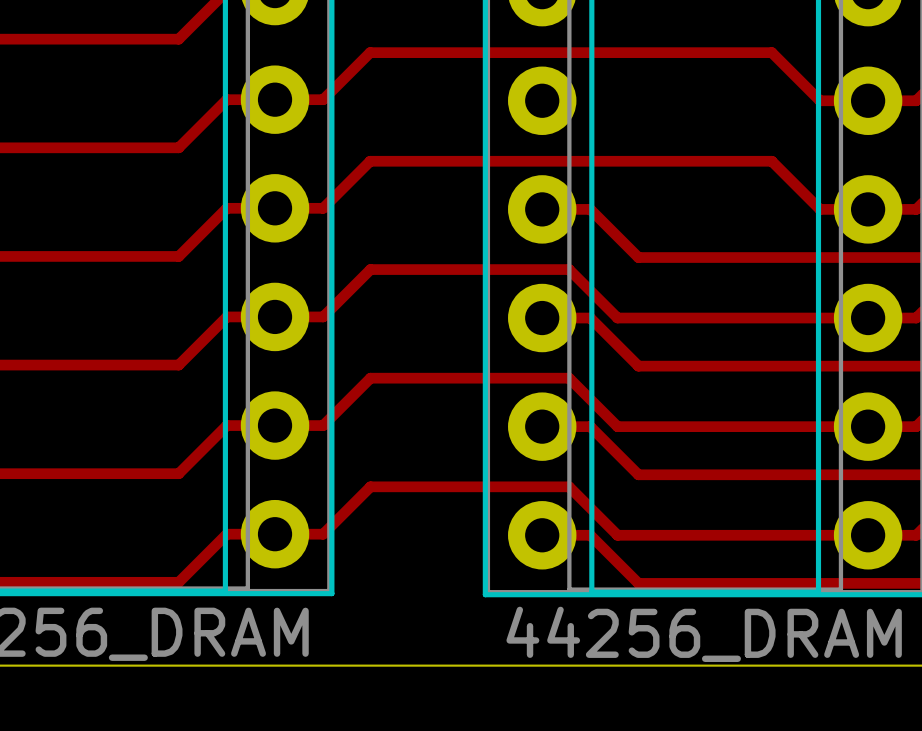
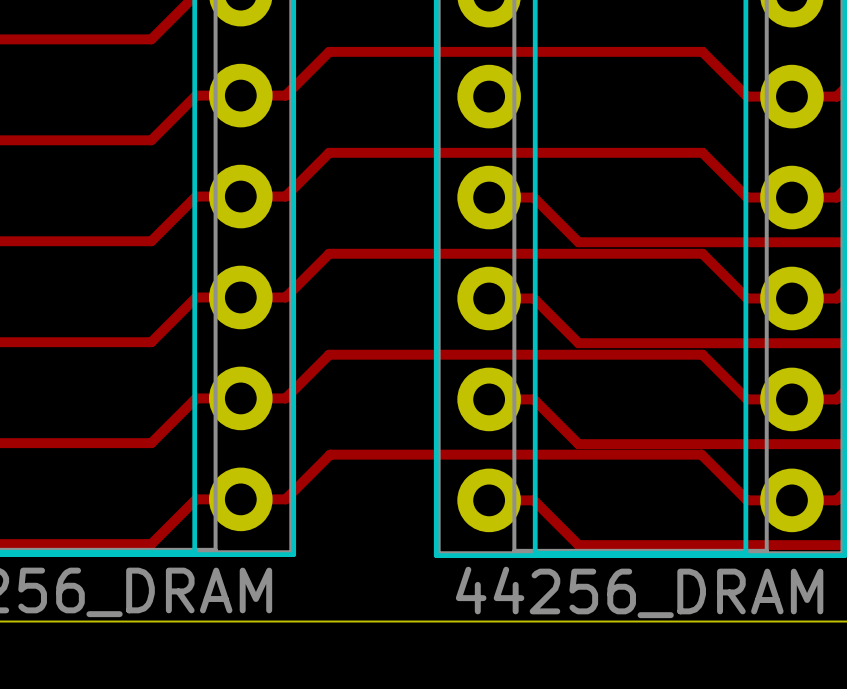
track: (370, 269) (569, 269) (617, 318) (819, 318) -> (329, 253) (702, 253) (747, 298)
track: (370, 378) (569, 378) (617, 426) (819, 426) -> (329, 354) (702, 354) (747, 399)
track: (370, 486) (569, 486) (617, 535) (819, 535) -> (329, 455) (701, 454) (747, 500)

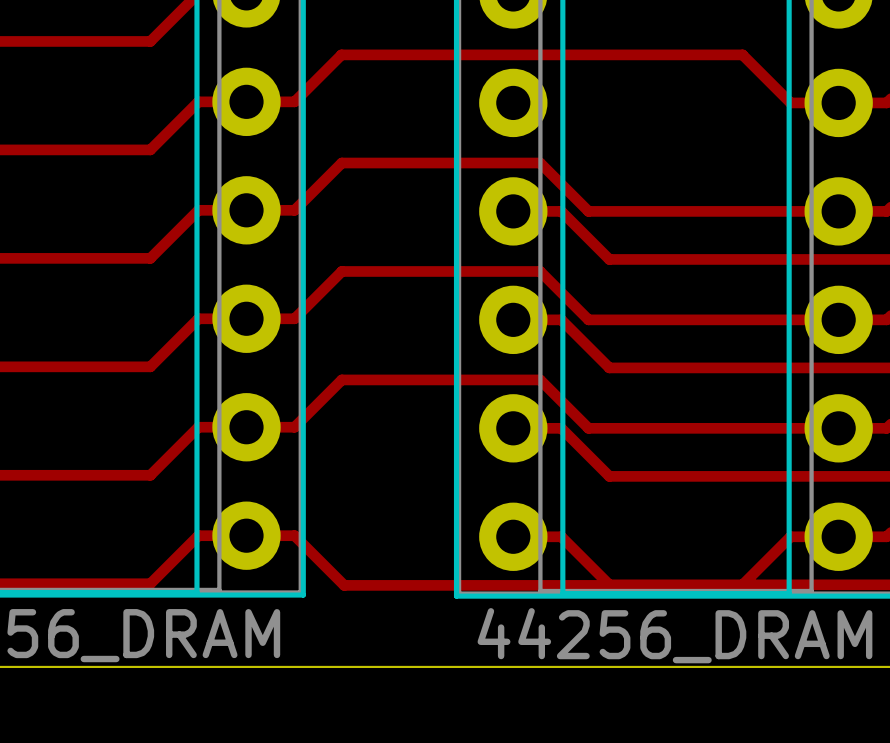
track: (329, 152) (702, 152) (747, 197) -> (341, 163) (540, 163) (588, 211) (790, 211)
track: (329, 253) (702, 253) (747, 298) -> (341, 271) (540, 271) (588, 319) (790, 319)
track: (329, 354) (702, 354) (747, 399) -> (341, 379) (540, 379) (588, 428) (790, 428)
track: (285, 499) (330, 454) (701, 454) (747, 500) -> (294, 535) (344, 585) (742, 585) (790, 536)

